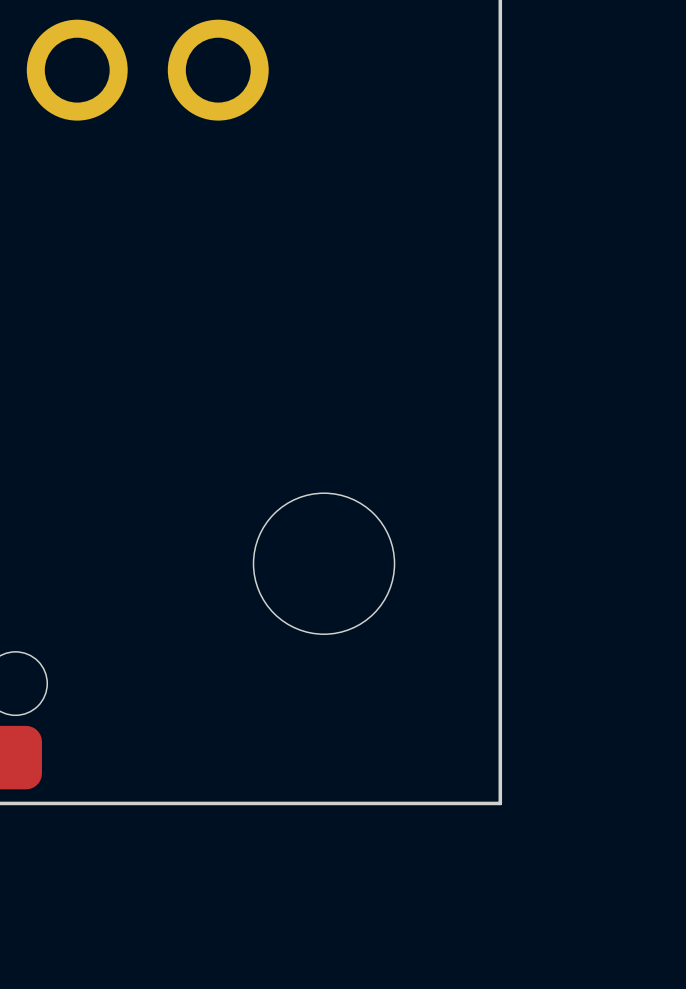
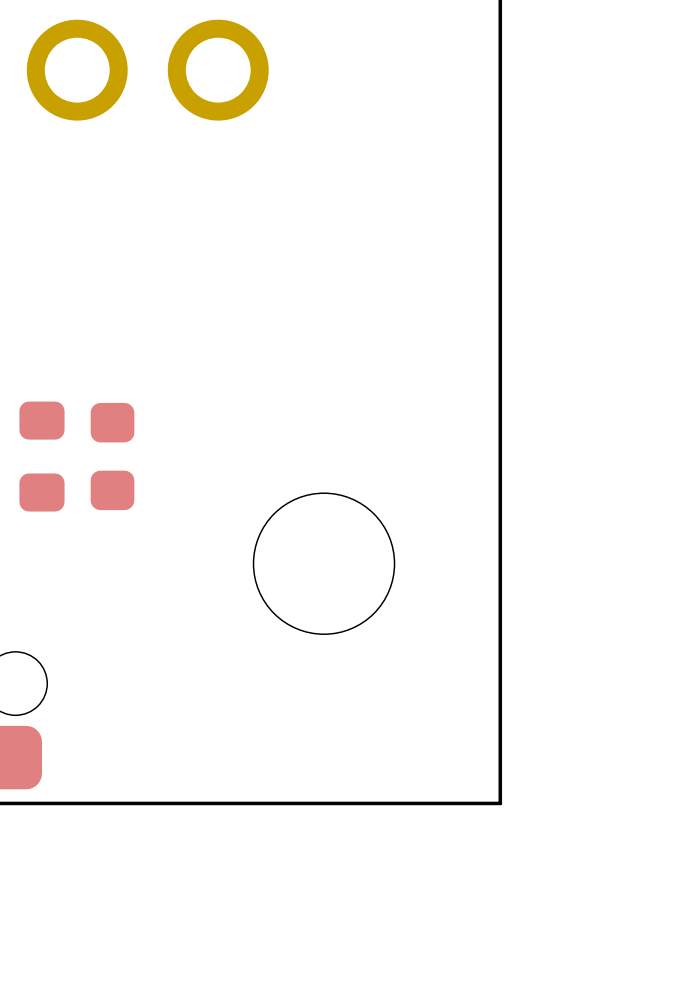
part: none -> (41, 456)
part: none -> (112, 456)

